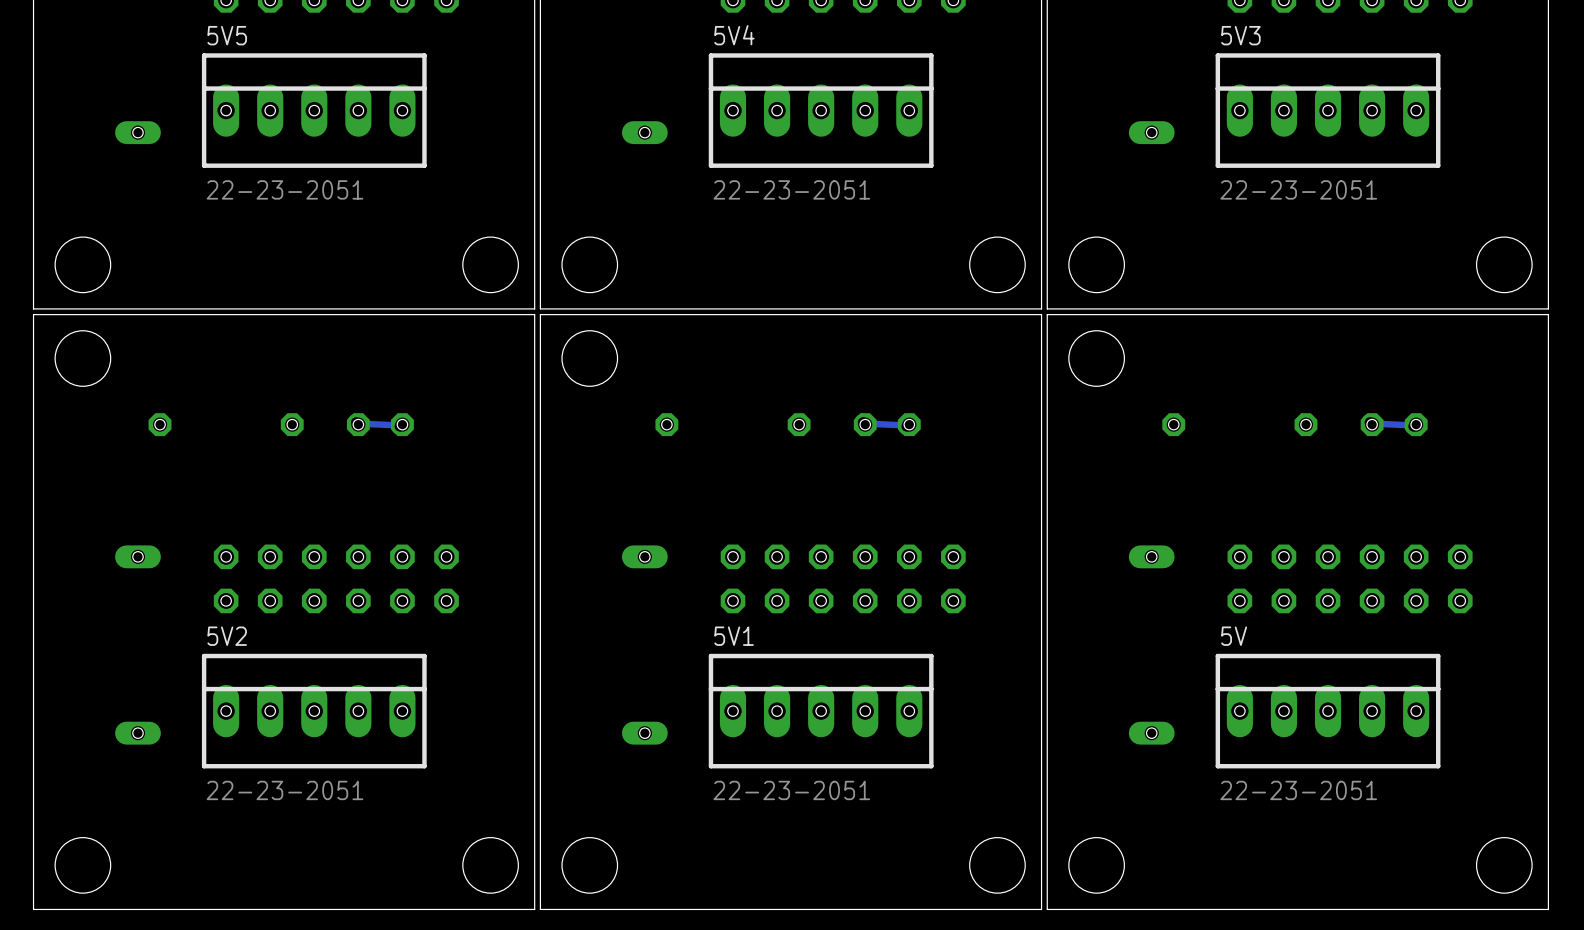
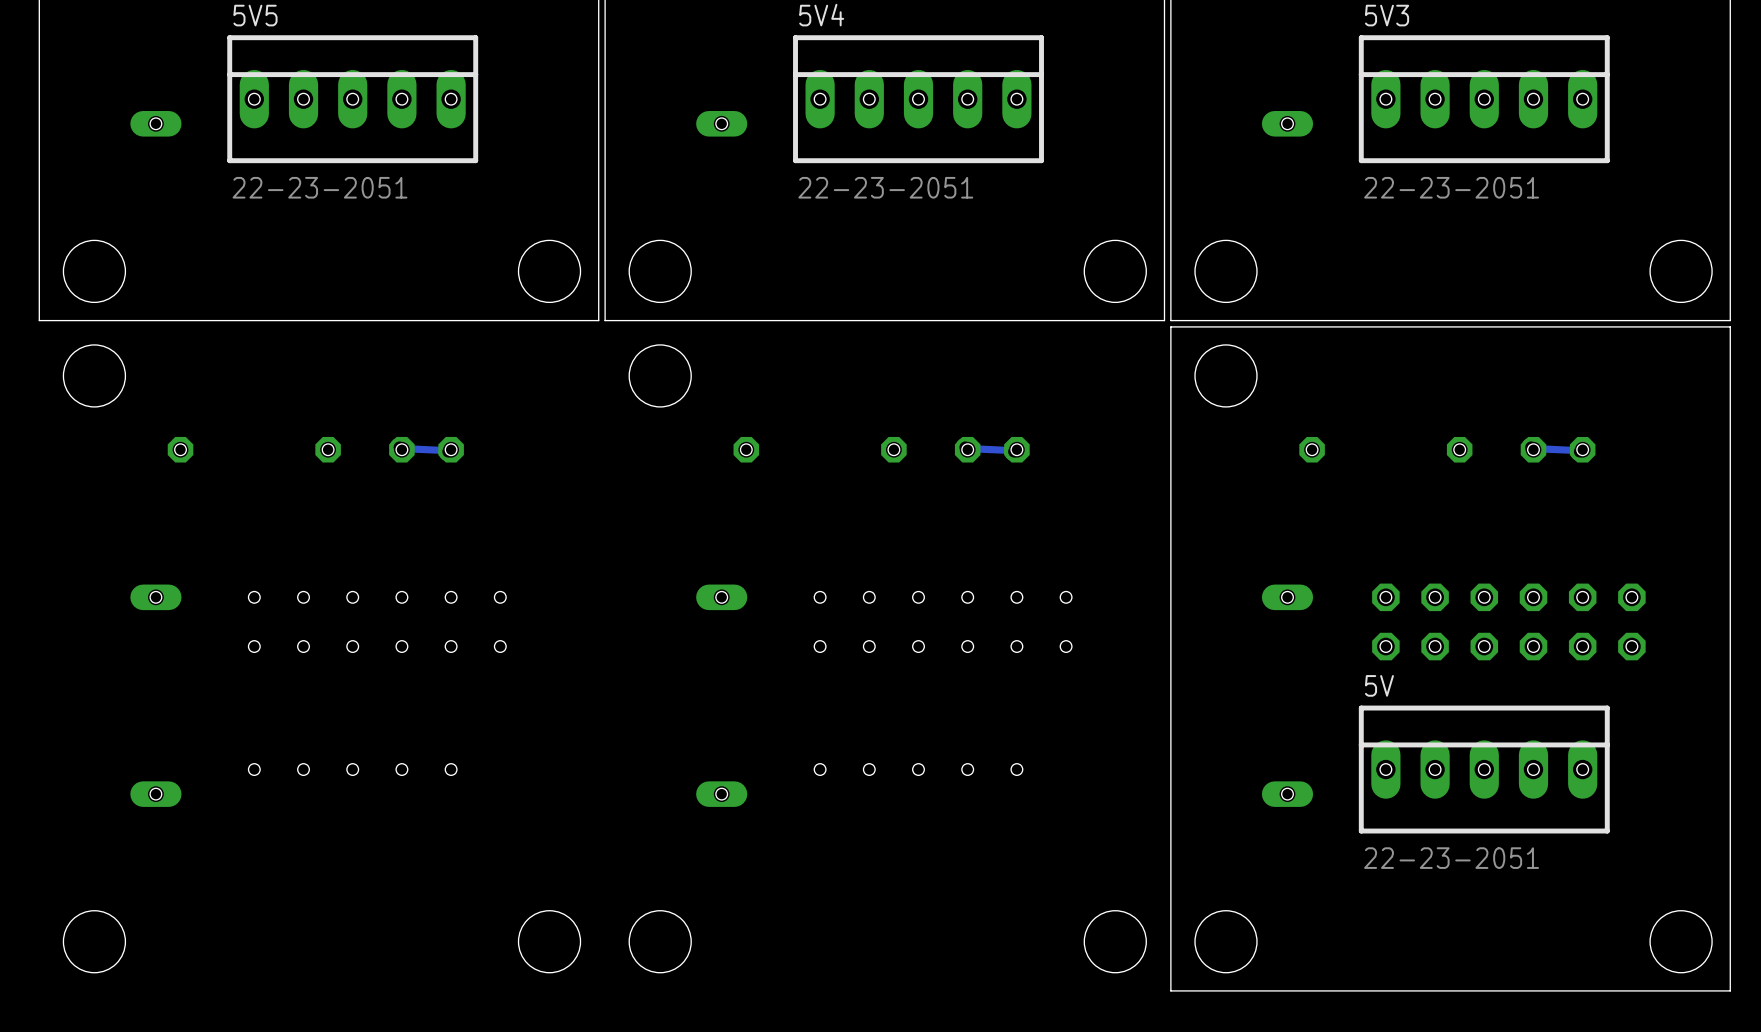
board edge: (534, 314) (33, 314) (33, 909) (534, 909) (534, 314) -> none
board edge: (1041, 314) (540, 314) (540, 909) (1041, 909) (1041, 314) -> none
part: (336, 578) -> none
part: (843, 578) -> none
5V2: 22-23-2051 (314, 711) -> none
5V1: 22-23-2051 (821, 711) -> none

